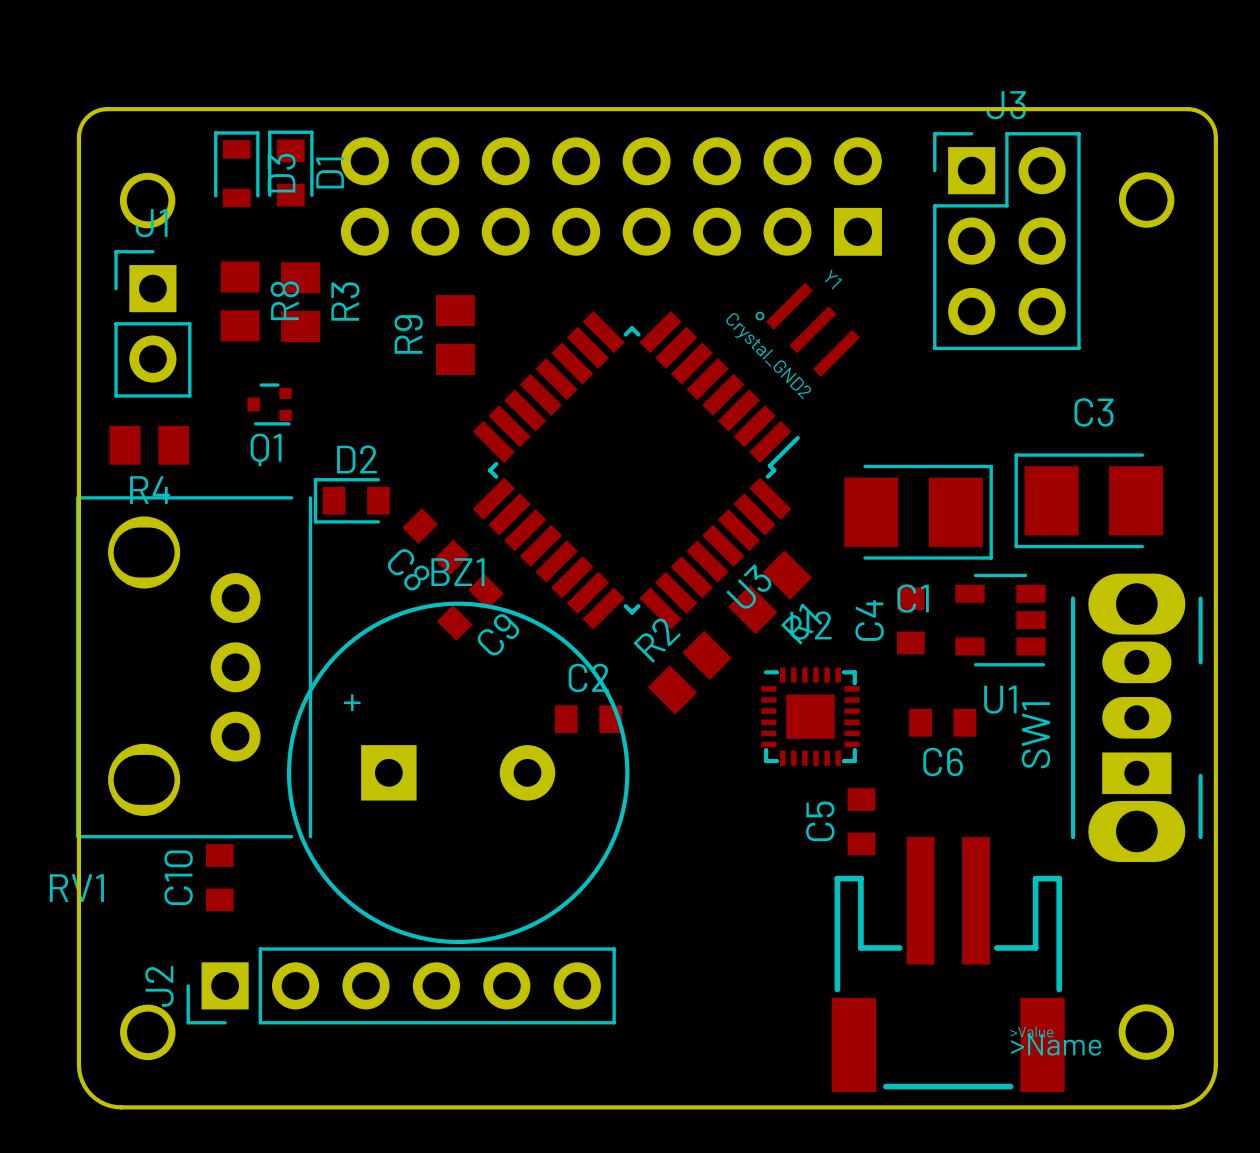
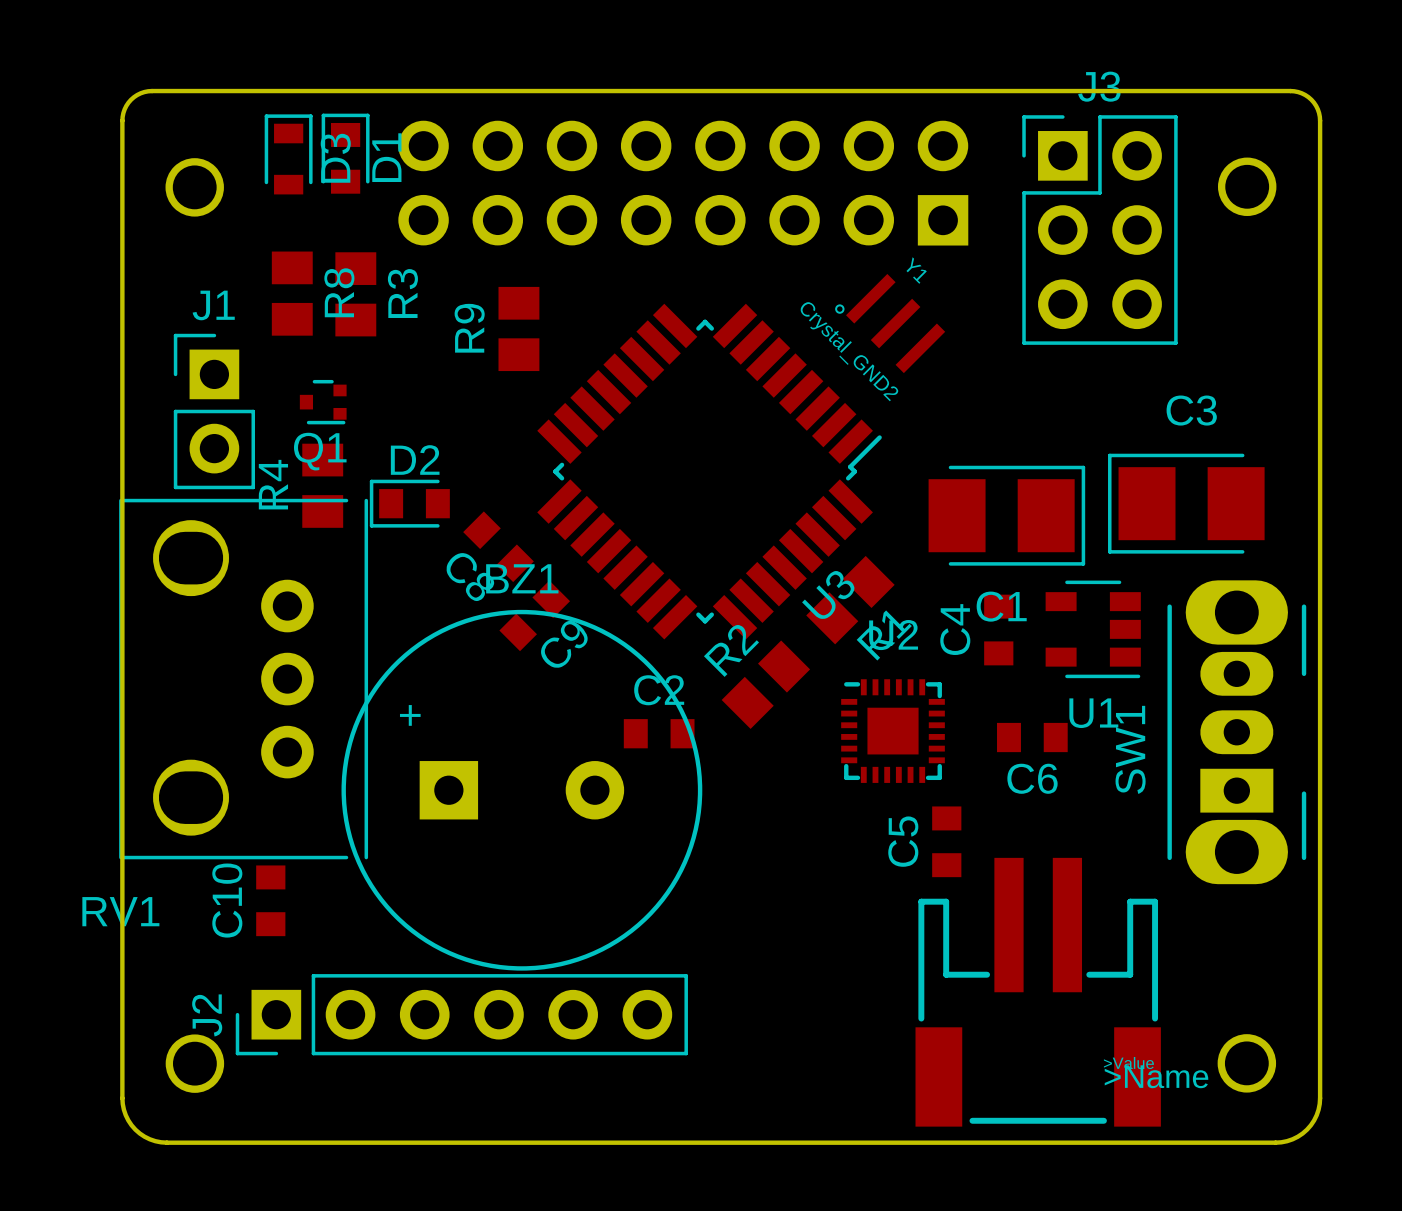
J1 position: (152, 323) -> (214, 411)
R4 rotation: 0° (149, 445) -> 90° clockwise (322, 485)
R4 position: (149, 445) -> (322, 485)

